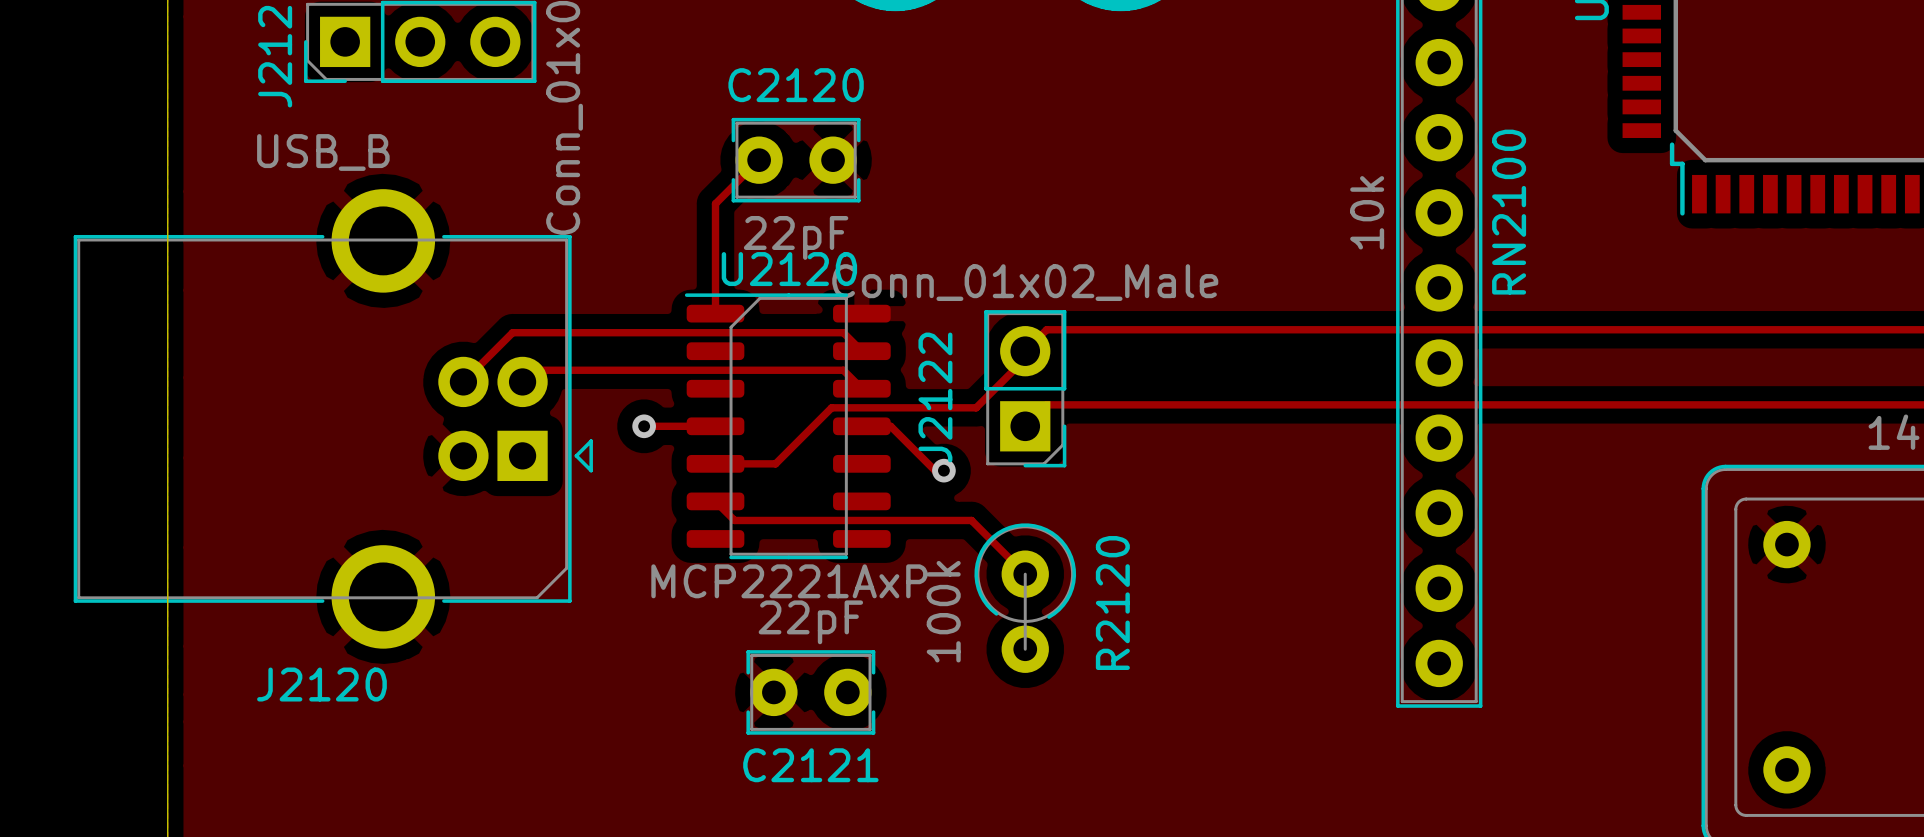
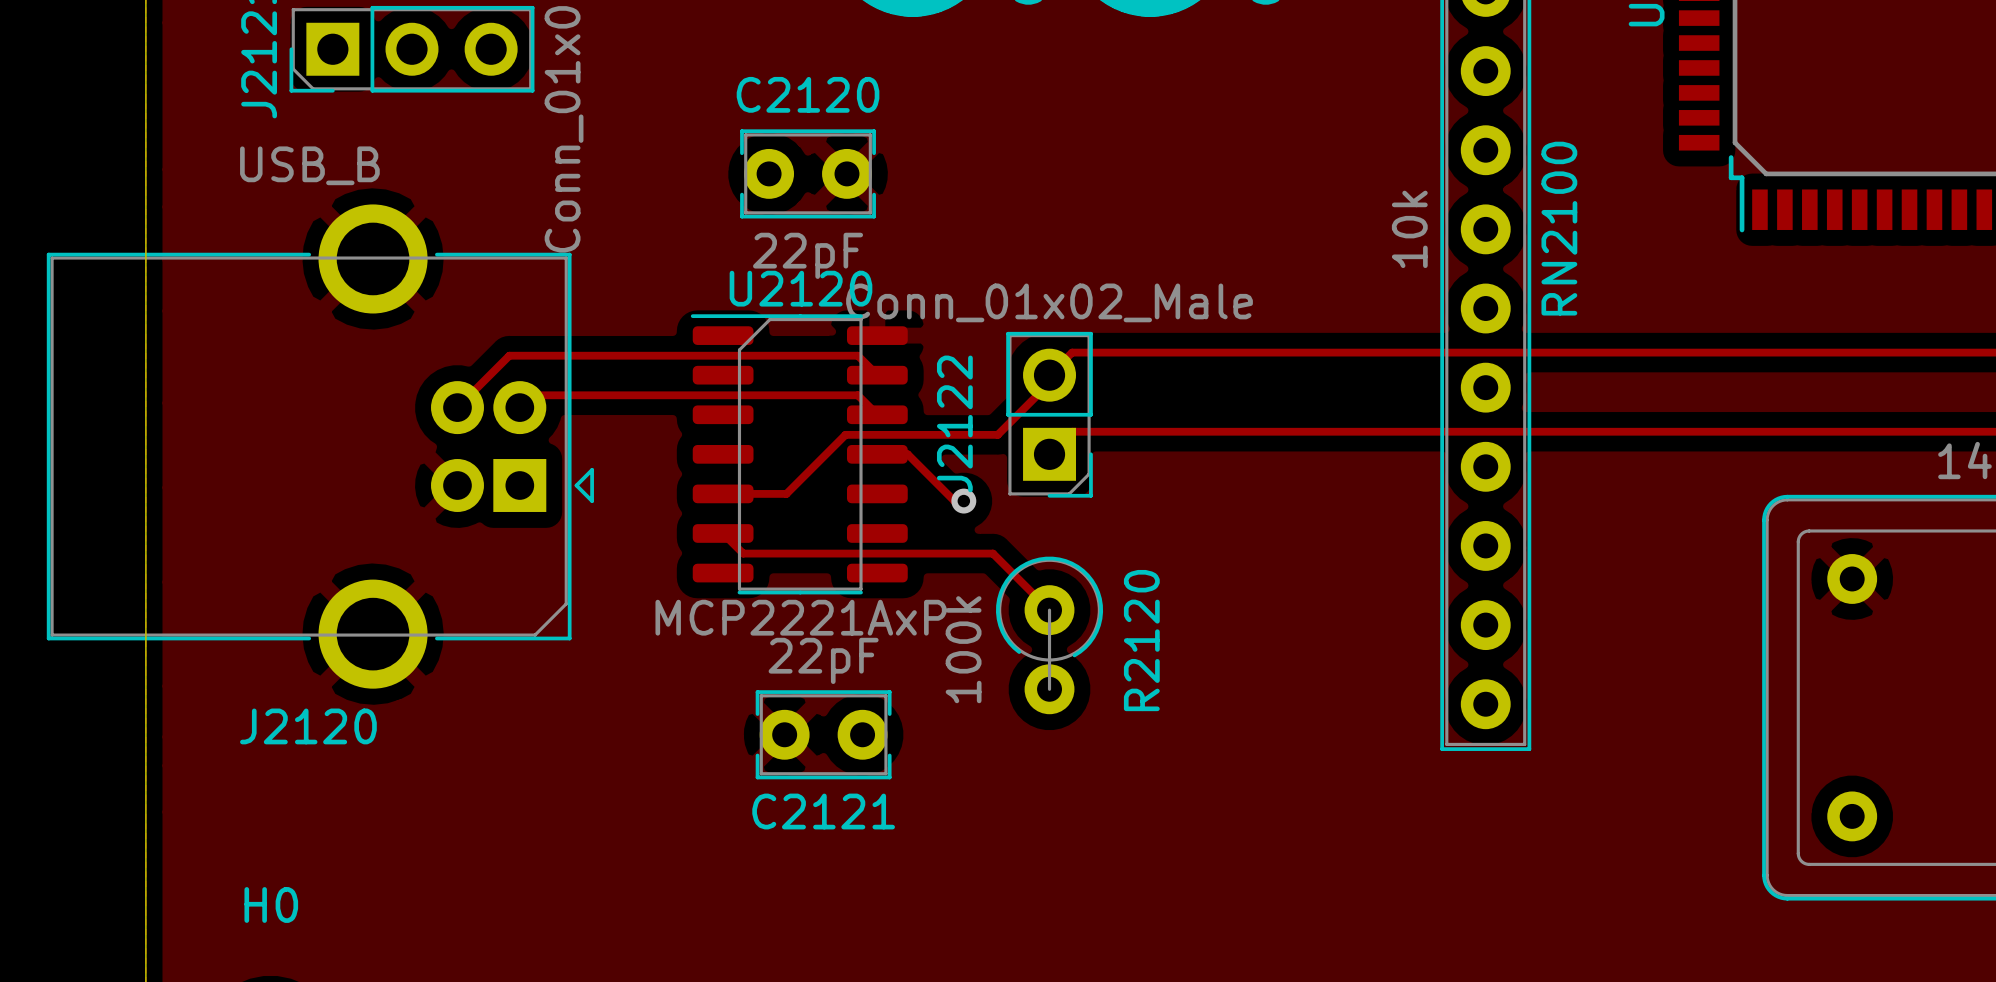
track: (759, 160) (715, 203) (715, 313) -> none
track: (644, 426) (715, 426) -> none
via: (644, 426) -> none

